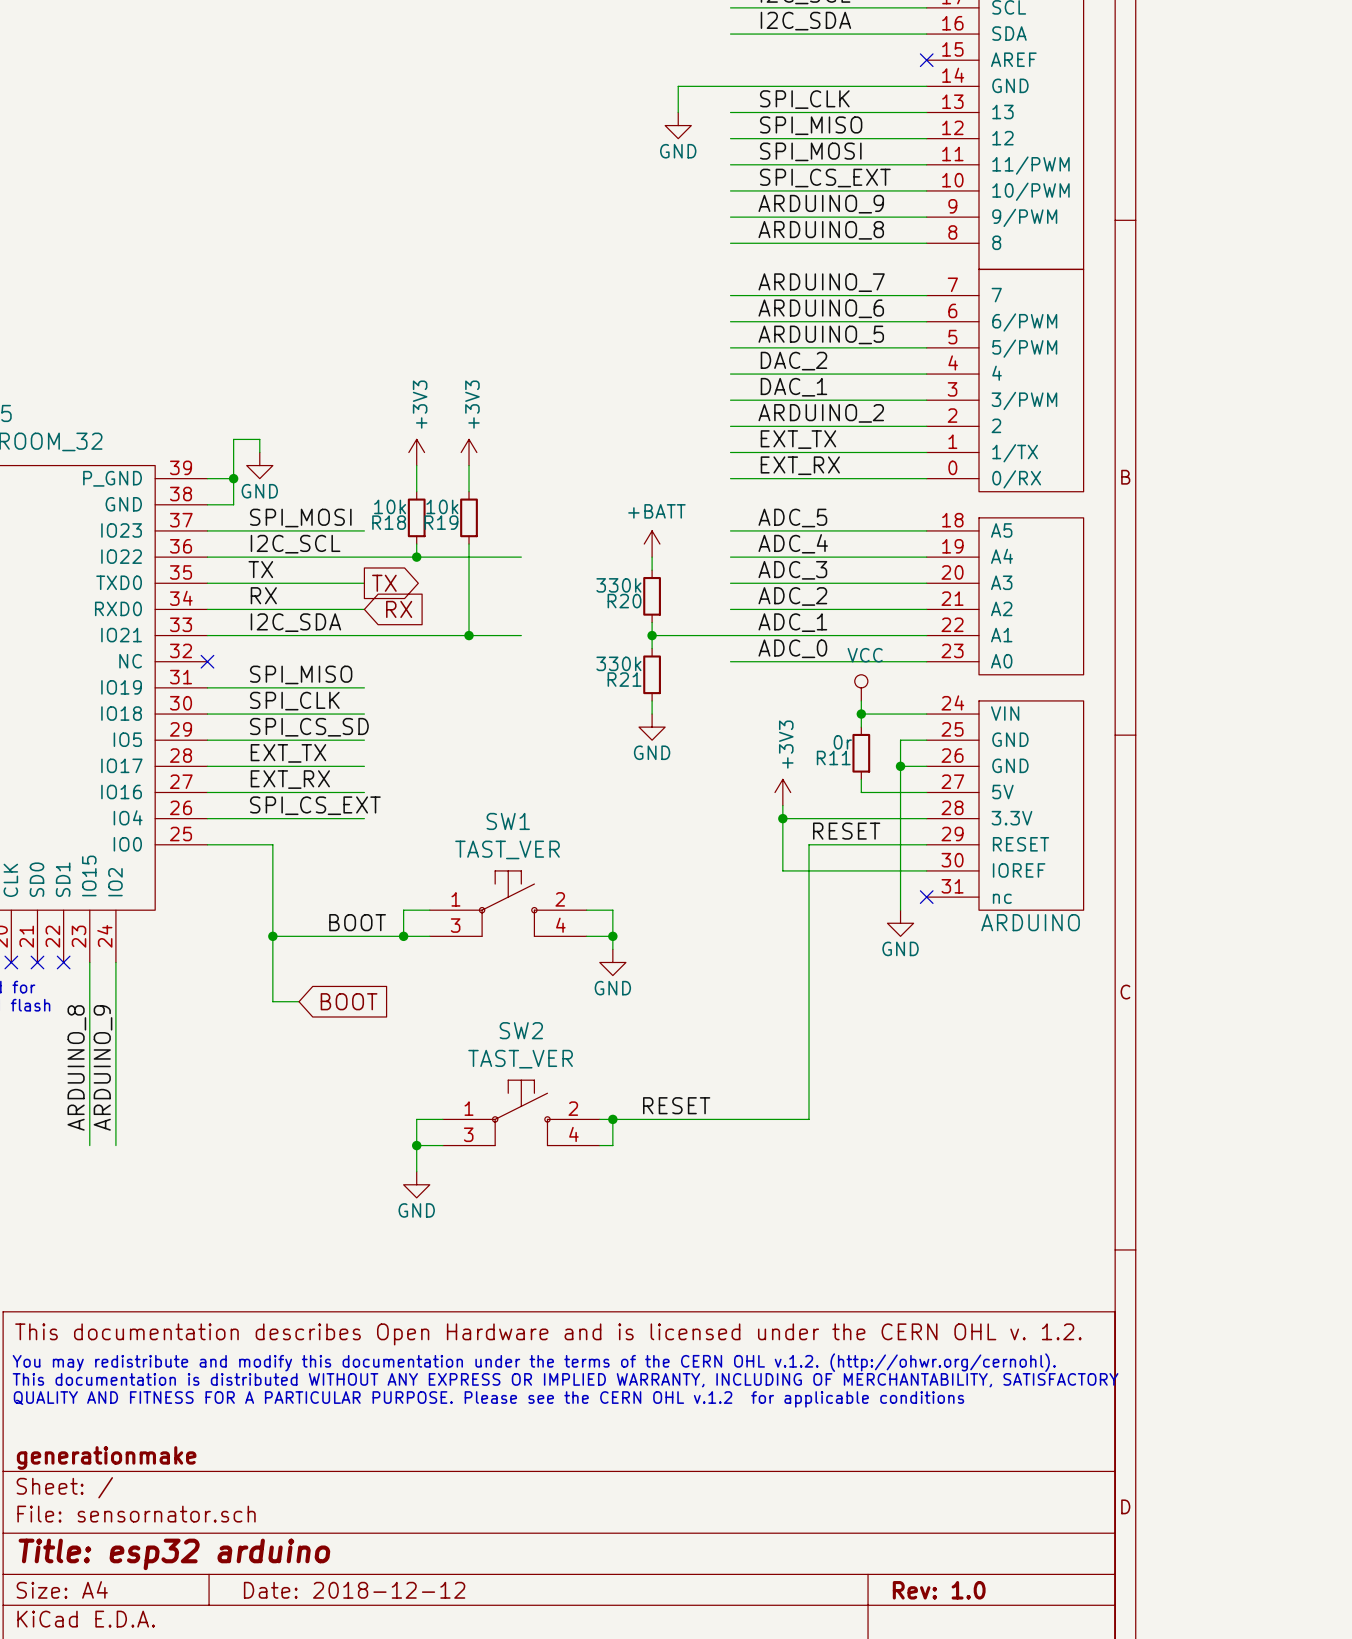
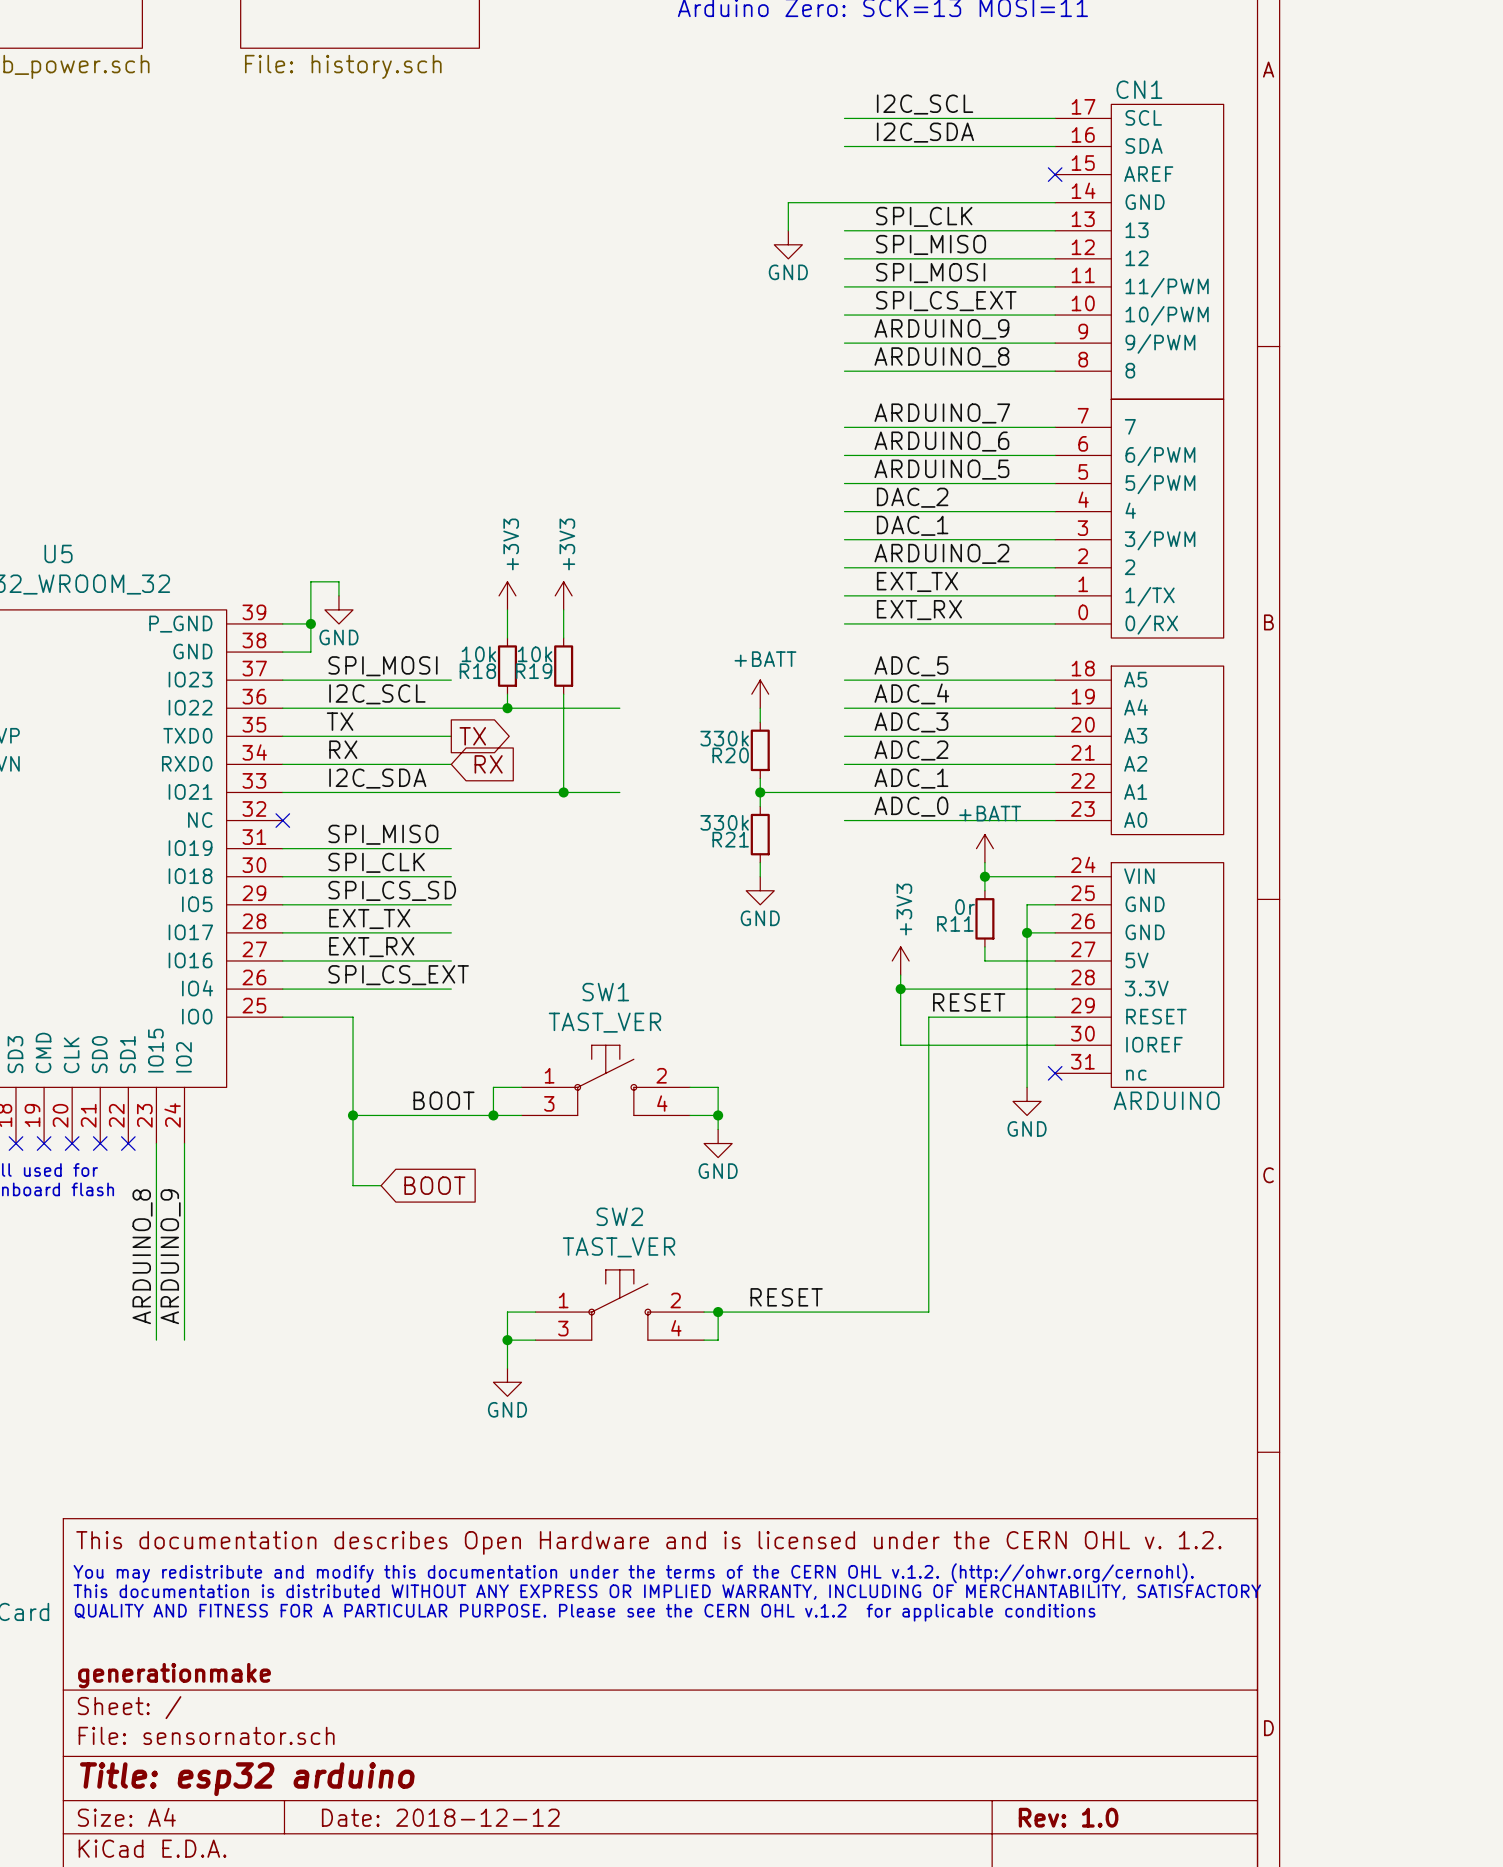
power symbol: VCC (861, 687) -> +BATT (984, 848)

